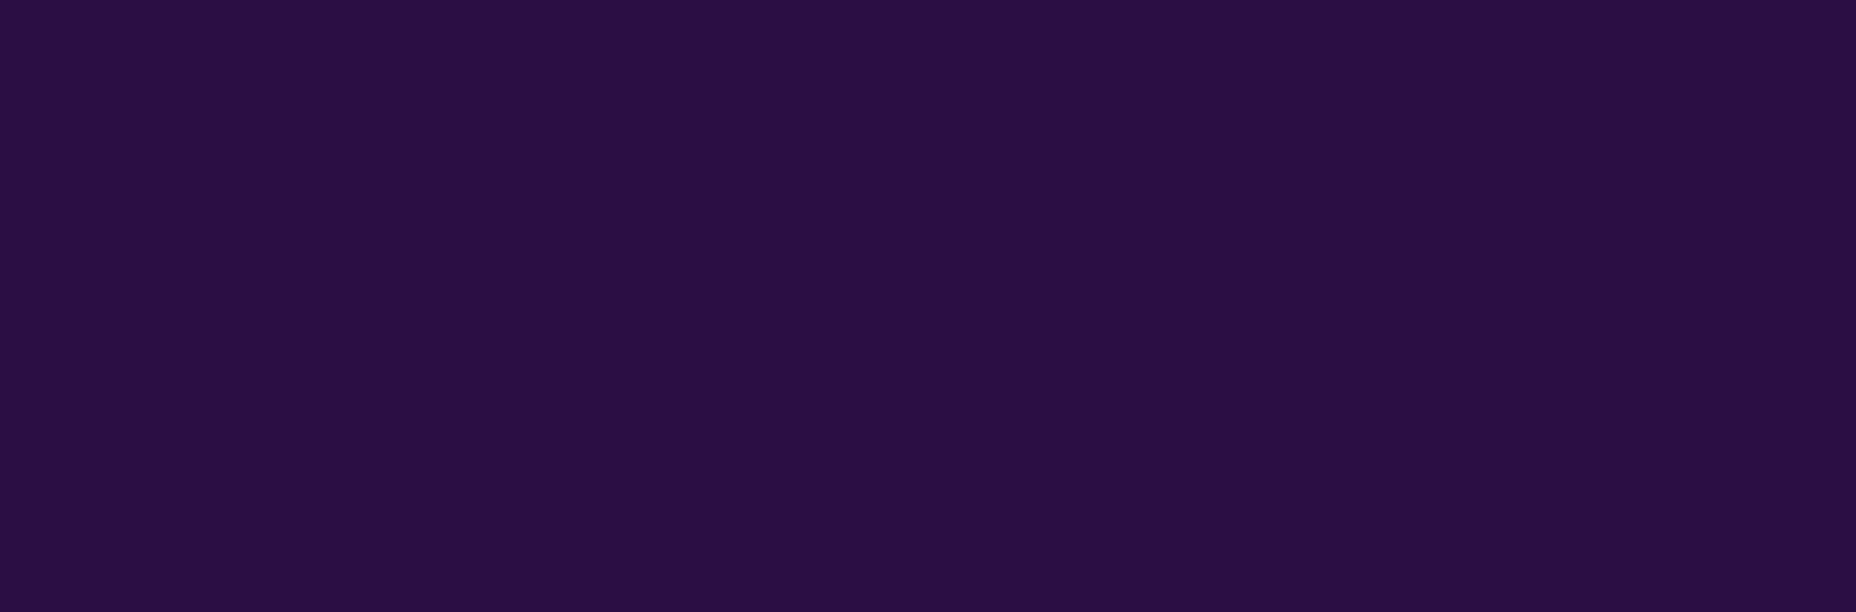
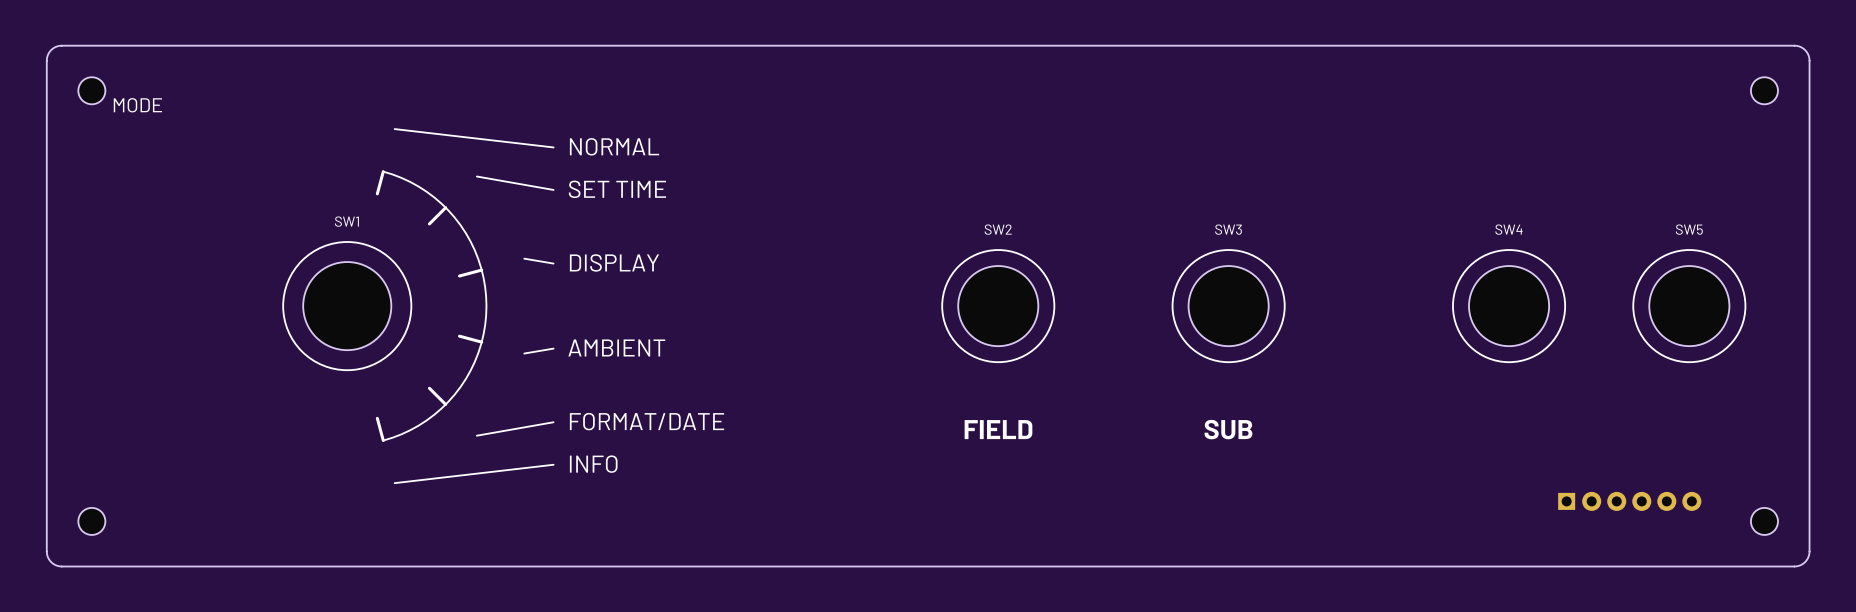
board edge: none -> (61, 45) (1799, 46) (1807, 52) (1809, 60) (1808, 556) (1802, 564) (1794, 566) (56, 565) (49, 559) (46, 551) (46, 60) (51, 50) (61, 45)
part: none -> (91, 90)
part: none -> (1764, 90)
text: none -> MODE (137, 105)
line: none -> (394, 129) (553, 147)
text: none -> NORMAL (614, 146)
line: none -> (476, 176) (553, 189)
text: none -> SET TIME (617, 189)
line: none -> (377, 193) (383, 171) (418, 186) (448, 210) (465, 233) (478, 259) (483, 277) (486, 306) (483, 334) (478, 353) (465, 379) (448, 401) (418, 425) (383, 440) (377, 418)
line: none -> (445, 207) (429, 223)
line: none -> (524, 258) (553, 263)
text: none -> DISPLAY (614, 262)
line: none -> (481, 270) (459, 276)
SW1: none -> (347, 306)
SW2: none -> (998, 306)
SW3: none -> (1228, 306)
SW4: none -> (1509, 306)
SW5: none -> (1689, 306)
line: none -> (459, 336) (481, 342)
text: none -> AMBIENT (616, 347)
line: none -> (553, 348) (524, 353)
line: none -> (429, 388) (445, 404)
line: none -> (553, 422) (476, 435)
text: none -> FORMAT/DATE (646, 421)
text: none -> FIELD (998, 429)
text: none -> SUB (1228, 429)
line: none -> (553, 464) (394, 483)
text: none -> INFO (593, 464)
part: none -> (1629, 501)
part: none -> (91, 521)
part: none -> (1764, 521)

